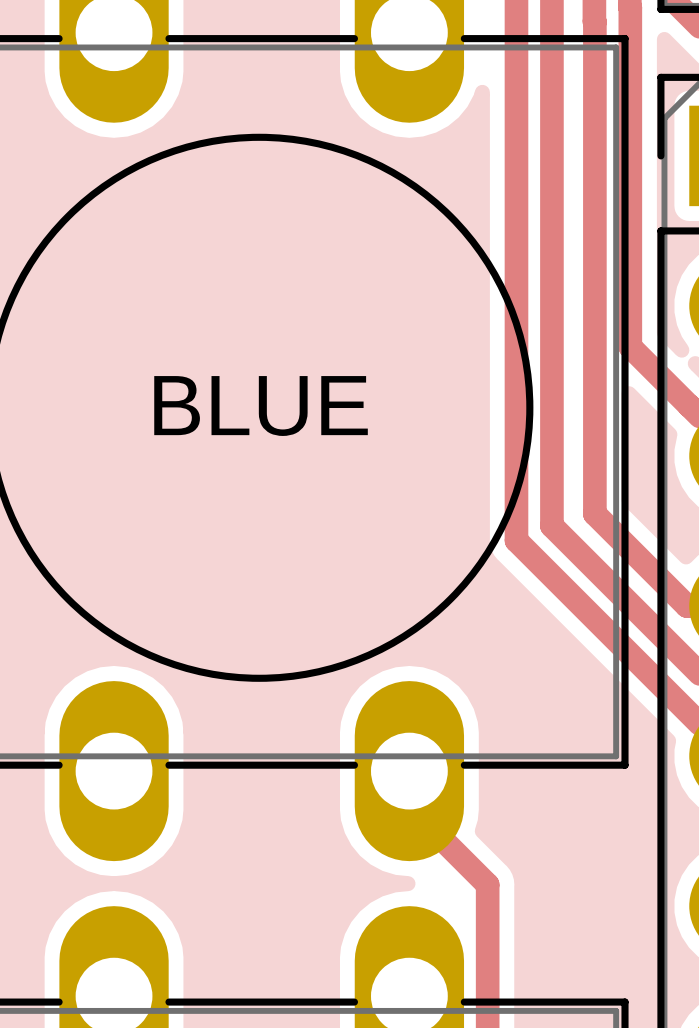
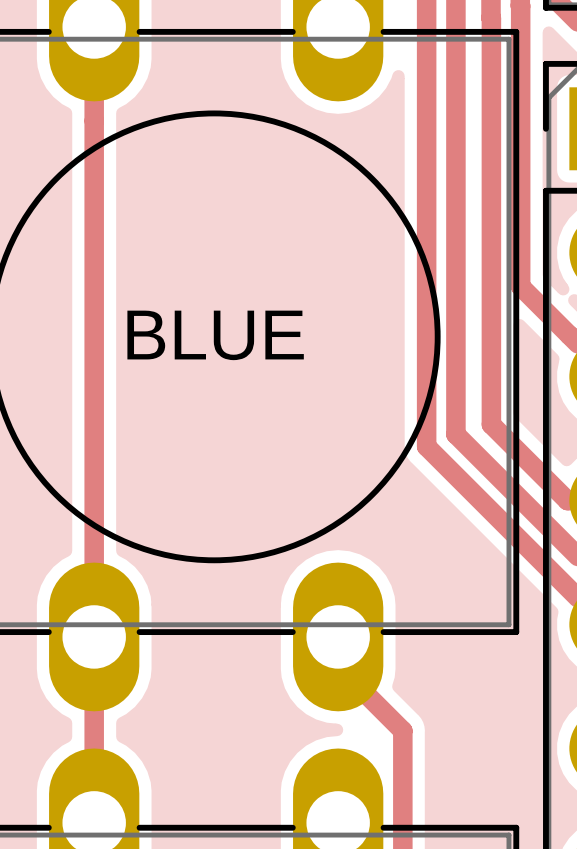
track: none -> (94, 27) (94, 822)

